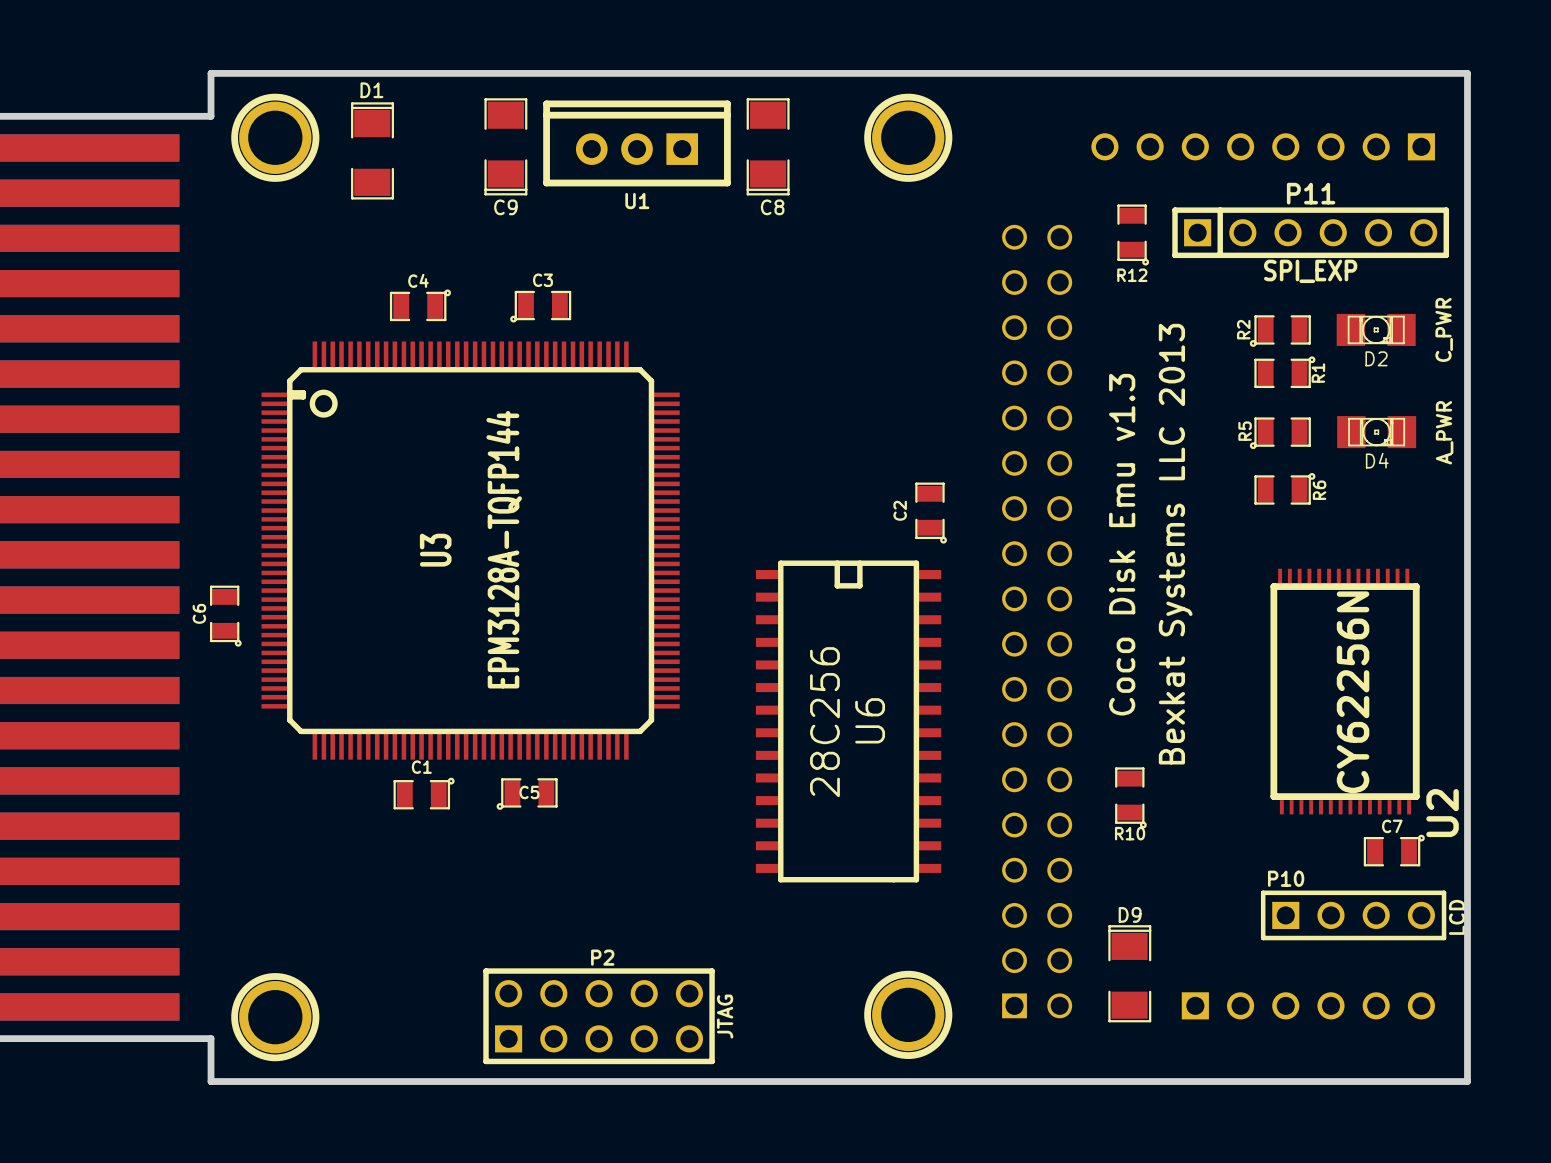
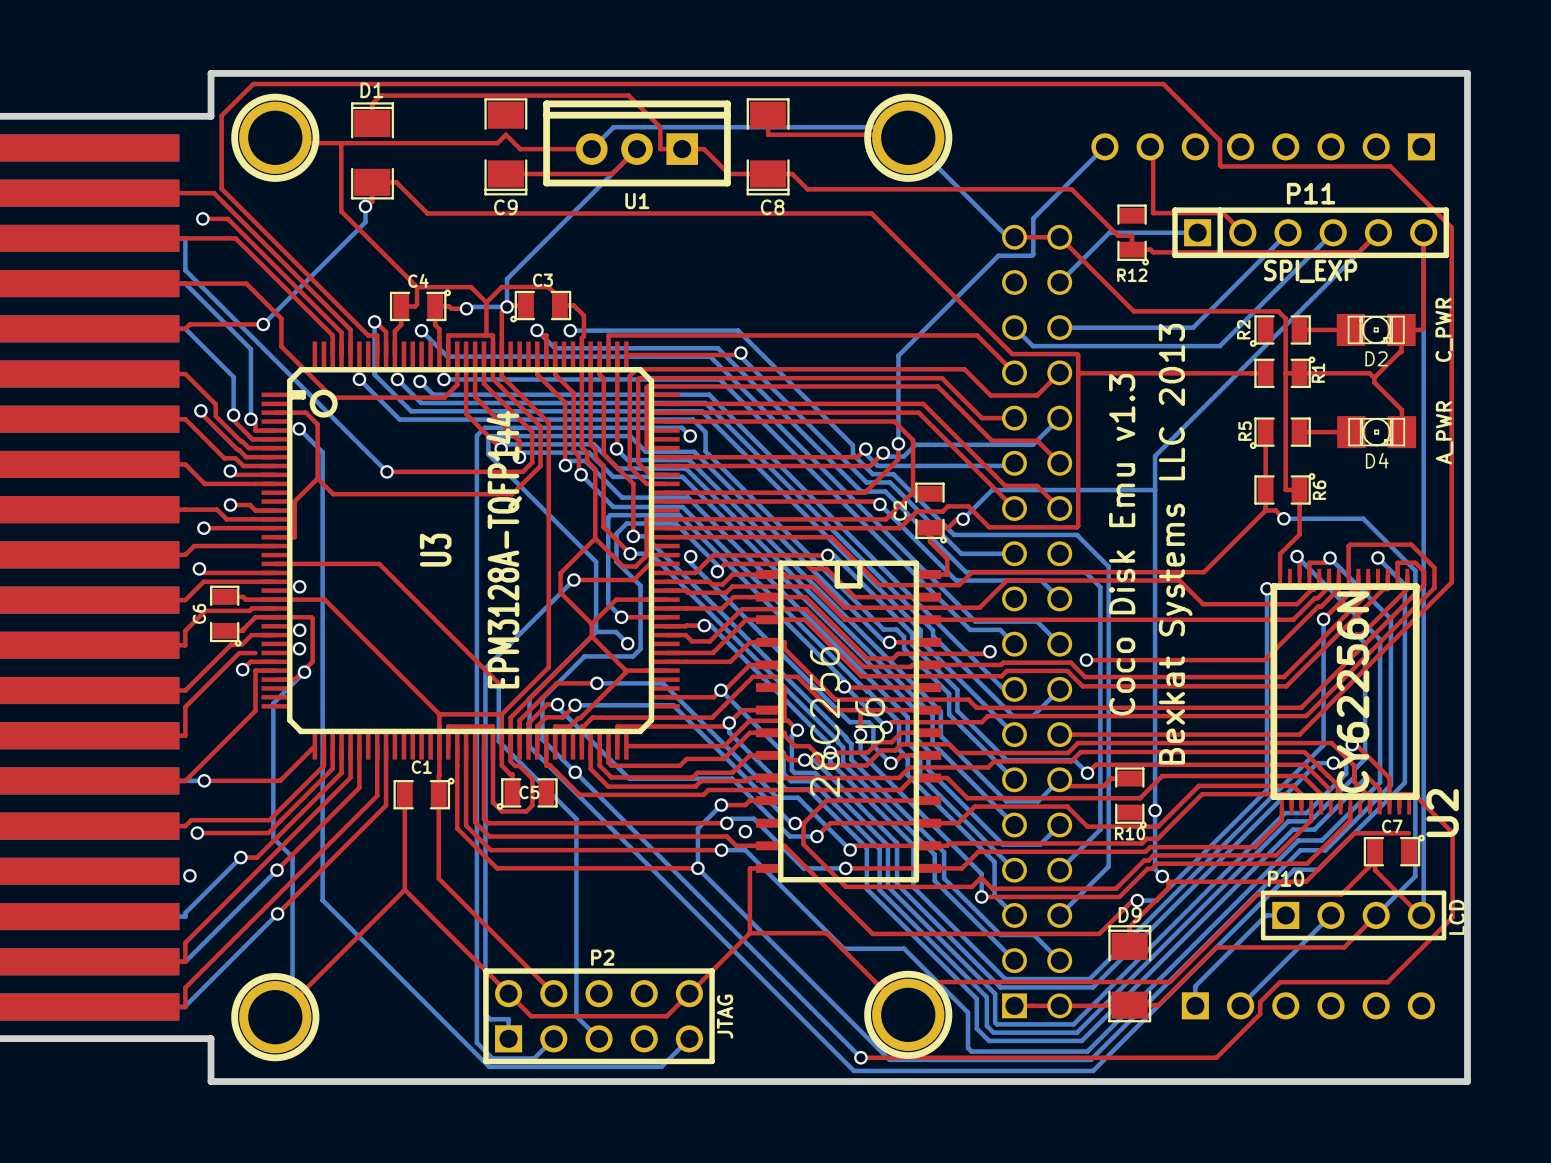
top track: none -> (768, 115) (768, 134) (905, 134) (908, 137)
top track: none -> (372, 123) (372, 103) (380, 95) (628, 95) (660, 127) (660, 149) (704, 149) (728, 173) (792, 173) (807, 189) (1071, 189) (1118, 235) (1132, 235) (1132, 249) (1150, 249) (1153, 252) (1358, 252) (1378, 232)
top track: none -> (275, 137) (280, 143) (497, 143) (505, 134) (520, 149) (591, 149)
top track: none -> (341, 143) (341, 211) (417, 287)
bottom track: none -> (1104, 146) (1033, 218) (1033, 254) (998, 255) (898, 355) (898, 443)
top track: none -> (1150, 146) (1153, 149) (1153, 213) (1223, 213) (1242, 232)
bottom track: none -> (591, 149) (613, 127) (897, 127) (1007, 237) (1014, 237)
top track: none -> (637, 149) (612, 173) (505, 173)
bottom track: none -> (637, 149) (507, 279) (507, 306) (468, 306) (466, 308)
top track: none -> (88, 193) (214, 193) (350, 329) (350, 355)
top track: none -> (365, 206) (372, 201) (372, 182) (396, 182) (427, 213) (871, 213) (1012, 354) (1078, 355) (1076, 527) (989, 527) (968, 506) (947, 506) (942, 511) (916, 511) (900, 528) (666, 528)
bottom track: none -> (365, 206) (365, 222) (263, 324)
via: none -> (365, 206)
top track: none -> (202, 218) (227, 218) (341, 332) (341, 355)
via: none -> (202, 218)
bottom track: none -> (1197, 232) (1109, 232) (1059, 282)
bottom track: none -> (1288, 232) (1193, 327) (1059, 327)
bottom track: none -> (1333, 232) (1219, 346) (1032, 346) (1014, 327)
bottom track: none -> (1378, 232) (1155, 456) (1155, 869) (1162, 876)
top track: none -> (1423, 232) (1423, 328) (1421, 329) (1401, 329) (1401, 351) (1374, 377)
bottom track: none -> (1423, 232) (1423, 913) (1421, 915)
top track: none -> (1014, 237) (1059, 237) (1133, 311) (1278, 311) (1285, 318) (1285, 489) (1299, 489) (1299, 534) (1280, 554) (1280, 575)
top track: none -> (88, 238) (235, 238) (332, 335) (332, 355)
bottom track: none -> (88, 238) (185, 238) (185, 270) (386, 471)
top track: none -> (88, 283) (246, 283) (281, 318) (281, 346) (332, 397) (444, 397) (457, 384) (457, 355)
bottom track: none -> (88, 283) (185, 283) (250, 349) (250, 419)
top track: none -> (417, 287) (417, 304) (415, 306) (401, 306) (401, 324) (394, 331) (394, 355)
top track: none -> (417, 287) (471, 287) (486, 302)
top track: none -> (486, 302) (501, 287) (548, 287) (566, 305)
top track: none -> (486, 302) (486, 335)
top track: none -> (526, 305) (512, 305) (507, 306) (501, 312) (501, 376) (548, 422) (548, 667) (501, 714)
top track: none -> (559, 305) (573, 305) (583, 315) (583, 336) (581, 338) (581, 447) (587, 452) (587, 461) (595, 469) (595, 538)
via: none -> (507, 306)
top track: none -> (466, 308) (435, 306) (435, 324) (439, 329) (439, 355)
via: none -> (466, 308)
top track: none -> (374, 321) (386, 332) (386, 355)
bottom track: none -> (374, 321) (374, 374) (411, 411) (701, 411) (920, 630) (920, 640) (1014, 734)
via: none -> (374, 321)
top track: none -> (263, 324) (189, 324) (185, 328) (88, 328)
via: none -> (263, 324)
bottom track: none -> (88, 328) (185, 328) (233, 377) (233, 415)
top track: none -> (1299, 329) (1350, 329)
bottom track: none -> (421, 330) (447, 356) (710, 356) (975, 621) (1037, 621) (1059, 644)
via: none -> (421, 330)
top track: none -> (537, 330) (542, 335) (546, 335) (546, 355)
bottom track: none -> (537, 330) (554, 348) (718, 348) (861, 491) (885, 491) (966, 572) (1085, 572) (1100, 587) (1100, 829) (1059, 870)
via: none -> (537, 330)
bottom track: none -> (570, 330) (738, 330) (852, 445) (852, 454) (872, 474) (893, 474) (954, 534) (1076, 534) (1108, 566) (1108, 866) (1059, 915)
via: none -> (570, 330)
top track: none -> (740, 353) (738, 355) (626, 355)
bottom track: none -> (740, 353) (740, 356) (866, 482) (889, 482) (961, 553) (1014, 553)
via: none -> (740, 353)
top track: none -> (377, 355) (377, 335) (368, 335) (221, 188) (221, 115) (253, 84) (1163, 84) (1220, 140) (1221, 166) (1390, 166) (1451, 227) (1451, 582) (1299, 734) (1059, 734)
top track: none -> (448, 355) (448, 335) (493, 335) (493, 378) (540, 426) (540, 465) (512, 494) (333, 494) (317, 478)
top track: none -> (466, 355) (466, 413) (501, 448)
top track: none -> (475, 355) (475, 396) (519, 441) (519, 457)
top track: none -> (483, 355) (483, 383) (532, 432) (532, 462) (522, 471) (386, 471)
top track: none -> (537, 355) (537, 374) (565, 402) (565, 465)
top track: none -> (555, 355) (555, 374) (573, 393) (573, 450) (578, 456) (578, 472) (581, 474)
top track: none -> (590, 355) (590, 444) (595, 449) (595, 457) (603, 465) (603, 527) (630, 553)
top track: none -> (599, 355) (599, 374) (603, 378) (603, 454) (633, 483) (633, 536)
top track: none -> (608, 355) (608, 335) (977, 335) (1014, 372)
top track: none -> (617, 355) (616, 448)
top track: none -> (1059, 372) (1037, 395) (990, 395) (964, 369) (636, 369) (629, 376) (629, 467) (646, 483) (666, 483)
top track: none -> (1078, 373) (1265, 373)
top track: none -> (1285, 373) (1369, 373) (1374, 377)
top track: none -> (88, 374) (185, 374) (215, 404) (215, 416) (248, 448) (275, 448)
top track: none -> (1374, 377) (1374, 382) (1401, 410) (1401, 432)
bottom track: none -> (359, 379) (399, 419) (692, 419) (705, 432) (705, 451) (883, 629) (896, 629) (904, 637) (904, 648) (949, 693) (949, 714) (1014, 779)
via: none -> (359, 379)
bottom track: none -> (397, 379) (421, 403) (705, 403) (933, 630) (933, 636) (1013, 716) (1033, 716) (1059, 689)
via: none -> (397, 379)
bottom track: none -> (443, 379) (719, 379) (970, 629) (1000, 629) (1014, 644)
via: none -> (443, 379)
bottom track: none -> (419, 381) (433, 394) (709, 394) (1003, 689) (1014, 689)
via: none -> (419, 381)
top track: none -> (666, 403) (923, 403) (1005, 485) (1037, 485) (1059, 508)
top track: none -> (200, 410) (200, 413) (246, 457) (275, 457)
via: none -> (200, 410)
top track: none -> (275, 412) (305, 412) (317, 424) (317, 478)
top track: none -> (666, 412) (918, 412) (1014, 508)
top track: none -> (233, 415) (233, 420) (252, 439) (275, 439)
via: none -> (233, 415)
top track: none -> (1014, 418) (981, 418) (941, 378) (639, 378) (638, 462) (650, 474) (666, 474)
bottom track: none -> (1059, 418) (1033, 444) (915, 444) (903, 456) (886, 456) (883, 453)
top track: none -> (88, 419) (185, 419) (224, 458) (235, 458) (243, 466) (275, 466)
top track: none -> (250, 419) (255, 423) (255, 430) (275, 430)
via: none -> (250, 419)
top track: none -> (666, 421) (894, 421) (913, 440) (913, 493)
bottom track: none -> (299, 428) (322, 452) (322, 900) (489, 1066) (661, 1066) (689, 1038)
via: none -> (299, 428)
top track: none -> (1265, 432) (1265, 510)
top track: none -> (1299, 432) (1351, 432)
bottom track: none -> (690, 436) (682, 427) (484, 427) (476, 435) (476, 1042) (492, 1058) (534, 1058) (553, 1038)
via: none -> (690, 436)
top track: none -> (898, 443) (898, 459) (865, 492) (666, 492)
via: none -> (898, 443)
bottom track: none -> (501, 448) (505, 444) (593, 444) (618, 468) (685, 468) (932, 715) (932, 743) (1014, 825)
via: none -> (501, 448)
bottom track: none -> (616, 448) (627, 460) (689, 460) (940, 711) (940, 736) (1006, 801) (1038, 801) (1059, 779)
via: none -> (616, 448)
top track: none -> (666, 448) (646, 448) (647, 386) (937, 386) (991, 440) (1037, 440) (1059, 463)
top track: none -> (865, 449) (857, 457) (666, 457)
bottom track: none -> (865, 449) (865, 453) (877, 465) (1011, 465) (1014, 463)
via: none -> (865, 449)
top track: none -> (883, 453) (870, 466) (666, 466)
via: none -> (883, 453)
bottom track: none -> (519, 457) (523, 452) (588, 452) (613, 476) (682, 476) (916, 710) (916, 738) (928, 750) (928, 769) (1003, 844) (1040, 844) (1059, 825)
via: none -> (519, 457)
top track: none -> (88, 464) (185, 464) (204, 483) (275, 483)
bottom track: none -> (565, 465) (570, 460) (585, 460) (622, 497) (688, 497) (907, 717) (907, 742) (920, 754) (920, 775) (1014, 870)
via: none -> (565, 465)
top track: none -> (230, 471) (234, 474) (275, 474)
via: none -> (230, 471)
via: none -> (386, 471)
bottom track: none -> (581, 474) (613, 506) (682, 506) (867, 691)
via: none -> (581, 474)
top track: none -> (317, 478) (294, 501) (294, 537) (275, 537)
bottom track: none -> (1155, 490) (992, 490) (963, 519)
top track: none -> (929, 493) (911, 493) (885, 519) (646, 519) (646, 555) (635, 566) (623, 566) (595, 538)
top track: none -> (666, 501) (877, 501) (879, 504)
bottom track: none -> (879, 504) (956, 580) (1041, 580) (1059, 598)
via: none -> (879, 504)
top track: none -> (230, 505) (249, 505) (255, 510) (275, 510)
via: none -> (230, 505)
top track: none -> (88, 509) (217, 509) (226, 519) (275, 519)
top track: none -> (1265, 510) (1275, 510) (1283, 518)
top track: none -> (1265, 510) (1203, 572) (972, 572) (959, 585) (879, 585) (831, 537) (666, 537)
bottom track: none -> (1283, 518) (1363, 518) (1415, 570) (1415, 876) (1376, 915)
via: none -> (1283, 518)
top track: none -> (963, 519) (956, 519) (948, 527) (929, 527) (929, 541) (947, 558) (947, 574) (929, 574)
via: none -> (963, 519)
top track: none -> (203, 528) (275, 528)
via: none -> (203, 528)
bottom track: none -> (633, 536) (645, 536) (846, 737) (851, 743) (851, 759) (944, 852) (944, 878) (1000, 935) (1034, 935) (1059, 960)
via: none -> (633, 536)
top track: none -> (595, 538) (560, 573) (560, 592) (591, 624)
top track: none -> (275, 546) (194, 546) (185, 554) (88, 554)
bottom track: none -> (630, 553) (650, 553) (837, 740) (843, 747) (843, 763) (934, 854) (934, 880) (1014, 960)
via: none -> (630, 553)
top track: none -> (827, 555) (712, 555) (695, 572) (666, 572)
bottom track: none -> (827, 555) (834, 555) (912, 633) (912, 644) (957, 689) (957, 710) (1006, 760) (1074, 760) (1087, 773)
via: none -> (827, 555)
bottom track: none -> (690, 556) (690, 563) (849, 722) (868, 722) (873, 726) (873, 745) (890, 763)
via: none -> (690, 556)
top track: none -> (1297, 556) (1299, 559) (1299, 575)
bottom track: none -> (1297, 556) (1380, 639) (1380, 782) (1321, 840) (1298, 840) (1087, 1051) (971, 1051) (968, 1047) (968, 1012) (904, 948) (843, 948) (745, 850) (721, 850)
via: none -> (1297, 556)
bottom track: none -> (1377, 557) (1404, 584) (1404, 782) (1317, 869) (1294, 869) (1093, 1070) (854, 1070) (529, 746) (529, 698) (596, 631)
via: none -> (1377, 557)
top track: none -> (1330, 558) (1325, 562) (1309, 562) (1309, 575)
bottom track: none -> (1330, 558) (1390, 618) (1390, 784) (1325, 850) (1300, 850) (1090, 1059) (889, 1059) (697, 868) (697, 828) (721, 805)
via: none -> (1330, 558)
top track: none -> (275, 563) (379, 563) (498, 683)
top track: none -> (666, 563) (649, 563) (633, 580) (573, 580)
top track: none -> (199, 568) (203, 572) (275, 572)
via: none -> (199, 568)
top track: none -> (717, 571) (725, 563) (806, 563) (811, 569) (826, 569) (854, 597) (929, 597)
bottom track: none -> (717, 571) (717, 565) (675, 523) (626, 523) (616, 533) (616, 561) (640, 585) (640, 649) (633, 656) (584, 656) (542, 698) (542, 739) (575, 772)
via: none -> (717, 571)
top track: none -> (1319, 575) (1319, 584) (1297, 604) (1203, 604) (1179, 580) (1006, 580) (979, 607) (844, 607) (814, 577) (787, 577) (784, 574) (732, 574) (722, 584) (712, 584) (709, 581) (666, 581)
top track: none -> (1329, 575) (1329, 586) (1293, 619) (844, 619) (811, 586) (732, 586) (726, 592) (666, 590)
top track: none -> (1338, 575) (1338, 589) (1321, 606) (1318, 606) (1264, 660) (1086, 660)
top track: none -> (1348, 575) (1350, 544) (1411, 544) (1434, 567) (1434, 587) (1306, 716) (987, 716) (981, 722) (891, 722) (886, 727)
top track: none -> (1358, 575) (1358, 589) (1353, 589) (1323, 619)
top track: none -> (1368, 575) (1368, 592) (1283, 677) (1085, 677) (1070, 662) (863, 666) (806, 609) (742, 609) (709, 641) (692, 641) (685, 635) (666, 635)
top track: none -> (1387, 575) (1387, 589) (1383, 589) (1286, 686) (1082, 686) (1067, 670) (1006, 670) (1001, 676) (861, 676) (804, 619) (746, 619) (712, 652) (666, 652)
top track: none -> (1397, 575) (1397, 562) (1415, 562) (1424, 571) (1424, 584) (1301, 707) (976, 707) (968, 699) (835, 699) (784, 648) (784, 642) (749, 642) (730, 661) (666, 661)
top track: none -> (1407, 575) (1407, 589) (1361, 634) (1356, 634)
bottom track: none -> (573, 580) (485, 668) (485, 1014) (490, 1019) (508, 1019) (508, 1038)
via: none -> (573, 580)
top track: none -> (275, 581) (203, 581) (185, 600) (88, 600)
via: none -> (299, 586)
bottom track: none -> (1267, 588) (1267, 789) (1156, 900) (1137, 900)
via: none -> (1267, 588)
top track: none -> (224, 596) (243, 596) (245, 599) (324, 599) (439, 714)
top track: none -> (666, 599) (616, 599) (591, 624)
top track: none -> (275, 608) (252, 608) (249, 610) (205, 610) (185, 630) (185, 645) (88, 645)
top track: none -> (666, 608) (722, 608) (733, 597) (805, 597) (867, 658) (893, 658) (897, 653) (987, 653) (989, 651)
top track: none -> (621, 617) (666, 617)
bottom track: none -> (621, 617) (608, 603) (608, 517) (610, 515) (679, 515) (844, 681) (844, 686)
via: none -> (621, 617)
bottom track: none -> (1323, 619) (1323, 745) (1089, 979) (1005, 979) (913, 887) (913, 845) (830, 762) (828, 743) (710, 625) (704, 625)
via: none -> (1323, 619)
top track: none -> (591, 624) (591, 636)
top track: none -> (704, 625) (666, 626)
via: none -> (704, 625)
top track: none -> (224, 630) (243, 630) (255, 617) (311, 617) (312, 661) (294, 679) (275, 679)
via: none -> (299, 630)
bottom track: none -> (596, 631) (596, 561) (488, 454) (489, 436) (630, 436) (645, 451) (694, 451) (884, 642) (889, 642)
bottom track: none -> (596, 631) (616, 631) (627, 643)
bottom track: none -> (1356, 634) (1365, 643) (1365, 758) (1354, 769) (1354, 777) (1310, 821) (1288, 821) (1077, 1032) (993, 1032) (986, 1025) (986, 997) (879, 890) (879, 849) (811, 781) (791, 781) (783, 773) (783, 752) (720, 690)
top track: none -> (275, 635) (251, 635) (241, 644) (231, 644) (185, 690) (88, 690)
top track: none -> (591, 636) (510, 717) (510, 761) (515, 765) (519, 765) (532, 778) (532, 805) (526, 811) (501, 811) (493, 802) (493, 726) (448, 726) (448, 746)
top track: none -> (591, 636) (625, 670)
top track: none -> (889, 642) (929, 642)
via: none -> (889, 642)
via: none -> (627, 643)
via: none -> (299, 648)
via: none -> (989, 651)
top track: none -> (255, 653) (239, 653) (185, 707) (185, 735) (88, 735)
via: none -> (1086, 660)
top track: none -> (275, 661) (250, 661) (242, 669)
top track: none -> (767, 664) (749, 664) (724, 690) (720, 690) (713, 697) (666, 697)
via: none -> (242, 669)
top track: none -> (275, 670) (255, 670) (255, 710) (185, 780) (88, 780)
top track: none -> (625, 670) (666, 670)
top track: none -> (625, 670) (570, 726) (555, 726) (555, 746)
bottom track: none -> (304, 672) (273, 703) (273, 838) (292, 857) (292, 999) (275, 1017)
via: none -> (304, 672)
bottom track: none -> (498, 683) (498, 741) (576, 818) (576, 1016) (599, 1038)
top track: none -> (596, 683) (556, 683) (519, 720) (519, 746)
bottom track: none -> (596, 683) (663, 683) (777, 797) (798, 797) (850, 849)
via: none -> (596, 683)
top track: none -> (844, 686) (929, 687)
bottom track: none -> (844, 686) (886, 727)
via: none -> (844, 686)
top track: none -> (767, 687) (784, 687) (784, 720)
via: none -> (720, 690)
bottom track: none -> (867, 691) (899, 722) (899, 749) (907, 758) (907, 775) (994, 862) (994, 895) (1014, 915)
top track: none -> (557, 704) (547, 704) (528, 723) (528, 746)
bottom track: none -> (557, 704) (557, 707) (629, 778) (732, 778) (789, 836) (816, 836)
via: none -> (557, 704)
top track: none -> (575, 705) (562, 717) (546, 717) (537, 726) (537, 746)
bottom track: none -> (575, 705) (673, 705) (791, 823) (795, 823)
via: none -> (575, 705)
top track: none -> (767, 710) (742, 710) (725, 726) (617, 726) (617, 746)
top track: none -> (860, 710) (860, 734)
top track: none -> (929, 710) (830, 710) (797, 676) (753, 676) (712, 717) (592, 717) (581, 726) (581, 746)
top track: none -> (439, 714) (438, 878) (553, 993)
top track: none -> (439, 714) (501, 714)
top track: none -> (501, 714) (501, 765) (512, 774) (512, 792)
bottom track: none -> (729, 722) (729, 732) (786, 789) (808, 789) (866, 848) (866, 888) (976, 998) (976, 1028) (989, 1040) (1081, 1040) (1293, 829) (1314, 829) (1367, 776)
via: none -> (729, 722)
via: none -> (886, 727)
top track: none -> (797, 730) (787, 720) (749, 720) (724, 746) (626, 746)
bottom track: none -> (797, 730) (791, 735) (791, 770) (794, 772) (815, 772) (887, 845) (887, 886) (995, 993) (995, 1022) (997, 1024) (1073, 1024) (1284, 813) (1306, 813) (1346, 773) (1346, 750) (1352, 744)
via: none -> (797, 730)
top track: none -> (929, 732) (901, 732) (891, 742) (878, 742) (867, 752) (830, 752)
bottom track: none -> (860, 734) (860, 752) (981, 873) (981, 896)
via: none -> (860, 734)
top track: none -> (1352, 744) (1356, 744) (1389, 778) (1389, 807)
via: none -> (1352, 744)
top track: none -> (314, 746) (280, 780) (204, 780)
top track: none -> (323, 746) (323, 765) (269, 820) (191, 820) (185, 826) (88, 826)
top track: none -> (332, 746) (332, 768) (268, 833) (197, 833)
top track: none -> (341, 746) (341, 773) (257, 857) (240, 857)
top track: none -> (350, 746) (350, 777) (185, 942) (185, 961) (88, 961)
top track: none -> (359, 746) (359, 787) (277, 870)
top track: none -> (377, 746) (377, 795) (185, 987) (185, 1006) (88, 1006)
top track: none -> (386, 746) (386, 805) (277, 913)
top track: none -> (457, 746) (457, 828) (497, 868) (697, 868)
top track: none -> (466, 746) (466, 825) (490, 850) (721, 850)
top track: none -> (475, 746) (475, 822) (489, 836) (726, 836) (736, 845) (784, 845) (872, 933) (1099, 933) (1132, 900) (1137, 900)
top track: none -> (483, 746) (483, 819) (488, 823) (726, 823)
top track: none -> (546, 746) (546, 765) (550, 765) (579, 794) (703, 794) (708, 790) (900, 790) (912, 777) (947, 777) (967, 798) (1140, 798) (1162, 776) (1302, 776) (1321, 794) (1321, 807)
top track: none -> (590, 746) (590, 768) (608, 786) (695, 786) (700, 781) (746, 781) (749, 777) (899, 777) (909, 767) (988, 767) (994, 761) (1071, 761) (1080, 752) (1304, 752) (1320, 768)
top track: none -> (599, 746) (599, 765) (611, 777) (692, 777) (697, 772) (732, 772) (749, 755) (784, 755) (789, 760) (804, 760)
top track: none -> (608, 746) (608, 762) (611, 765) (679, 765) (686, 758) (723, 758) (749, 732) (784, 732) (784, 735) (795, 746) (808, 746) (817, 754) (817, 759) (823, 765) (866, 765) (881, 750) (895, 750) (901, 744) (949, 744) (958, 753) (1068, 753) (1077, 743) (1331, 743) (1354, 765) (1354, 782) (1366, 794) (1369, 794) (1369, 807)
via: none -> (830, 752)
top track: none -> (929, 755) (901, 755) (894, 763) (890, 763)
bottom track: none -> (804, 760) (814, 760) (897, 843) (897, 884) (1000, 987) (1093, 987) (1317, 763) (1333, 763)
via: none -> (804, 760)
via: none -> (890, 763)
via: none -> (1333, 763)
top track: none -> (1320, 768) (1328, 775)
bottom track: none -> (575, 772) (860, 1057)
via: none -> (575, 772)
top track: none -> (1087, 773) (1095, 764) (1305, 764) (1329, 789)
via: none -> (1087, 773)
top track: none -> (1328, 775) (1337, 785) (1337, 791) (1340, 794) (1340, 807)
top track: none -> (1367, 776) (1379, 789) (1379, 807)
top track: none -> (1129, 778) (1111, 778) (1103, 786) (1066, 786) (1059, 779)
bottom track: none -> (185, 780) (204, 780)
via: none -> (204, 780)
top track: none -> (404, 794) (404, 889)
top track: none -> (767, 800) (749, 800) (745, 805) (721, 805)
top track: none -> (929, 800) (826, 800) (803, 823)
via: none -> (721, 805)
top track: none -> (1281, 807) (1281, 820) (1255, 847) (1150, 847) (1145, 851) (978, 851) (961, 868) (845, 868)
top track: none -> (1291, 807) (1291, 799) (1286, 794) (1202, 794) (1157, 838) (1146, 838) (1142, 843) (949, 843) (947, 845) (854, 845) (850, 849)
top track: none -> (1301, 807) (1301, 794) (1293, 785) (1198, 785) (1158, 826) (1087, 826) (1067, 806) (974, 806) (958, 823) (830, 823) (816, 836)
top track: none -> (1311, 807) (1311, 820) (1276, 855) (1153, 855) (1148, 860) (1144, 860) (1116, 888) (992, 888) (982, 878) (971, 886) (846, 886) (803, 844) (803, 823)
top track: none -> (1350, 807) (1350, 820) (1307, 863) (1157, 863) (1151, 868) (1147, 868) (1119, 896) (981, 896)
top track: none -> (1399, 807) (1399, 794) (1414, 794) (1452, 832) (1452, 917) (1387, 982) (1280, 982) (1260, 1002) (1260, 1014) (1216, 1057) (860, 1057)
via: none -> (1155, 810)
bottom track: none -> (726, 823) (731, 818) (753, 818) (803, 868) (845, 868)
via: none -> (726, 823)
via: none -> (795, 823)
via: none -> (745, 831)
via: none -> (197, 833)
top track: none -> (1408, 833) (1354, 833) (1306, 881) (1168, 881)
via: none -> (816, 836)
via: none -> (850, 849)
via: none -> (721, 850)
top track: none -> (1375, 851) (1375, 870) (1421, 915)
bottom track: none -> (240, 857) (185, 913) (185, 916) (88, 916)
via: none -> (240, 857)
top track: none -> (1375, 860) (1341, 894) (1257, 894) (1170, 982) (941, 982) (908, 1014) (826, 933) (749, 933)
via: none -> (697, 868)
top track: none -> (767, 868) (749, 868) (749, 933)
via: none -> (845, 868)
bottom track: none -> (277, 870) (185, 961) (88, 961)
via: none -> (277, 870)
via: none -> (189, 875)
via: none -> (1162, 876)
top track: none -> (1168, 881) (1168, 887) (1129, 926) (1129, 946)
top track: none -> (404, 889) (531, 1016) (666, 1016) (749, 933)
top track: none -> (404, 889) (277, 1017) (275, 1017)
via: none -> (981, 896)
via: none -> (1137, 900)
bottom track: none -> (277, 913) (185, 1006) (88, 1006)
via: none -> (277, 913)
bottom track: none -> (1285, 915) (1266, 915) (1195, 986) (1195, 1005)
bottom track: none -> (1330, 915) (1240, 1005)
top track: none -> (1376, 915) (1344, 947) (1216, 947) (1158, 1005) (1014, 1005)
via: none -> (860, 1057)

